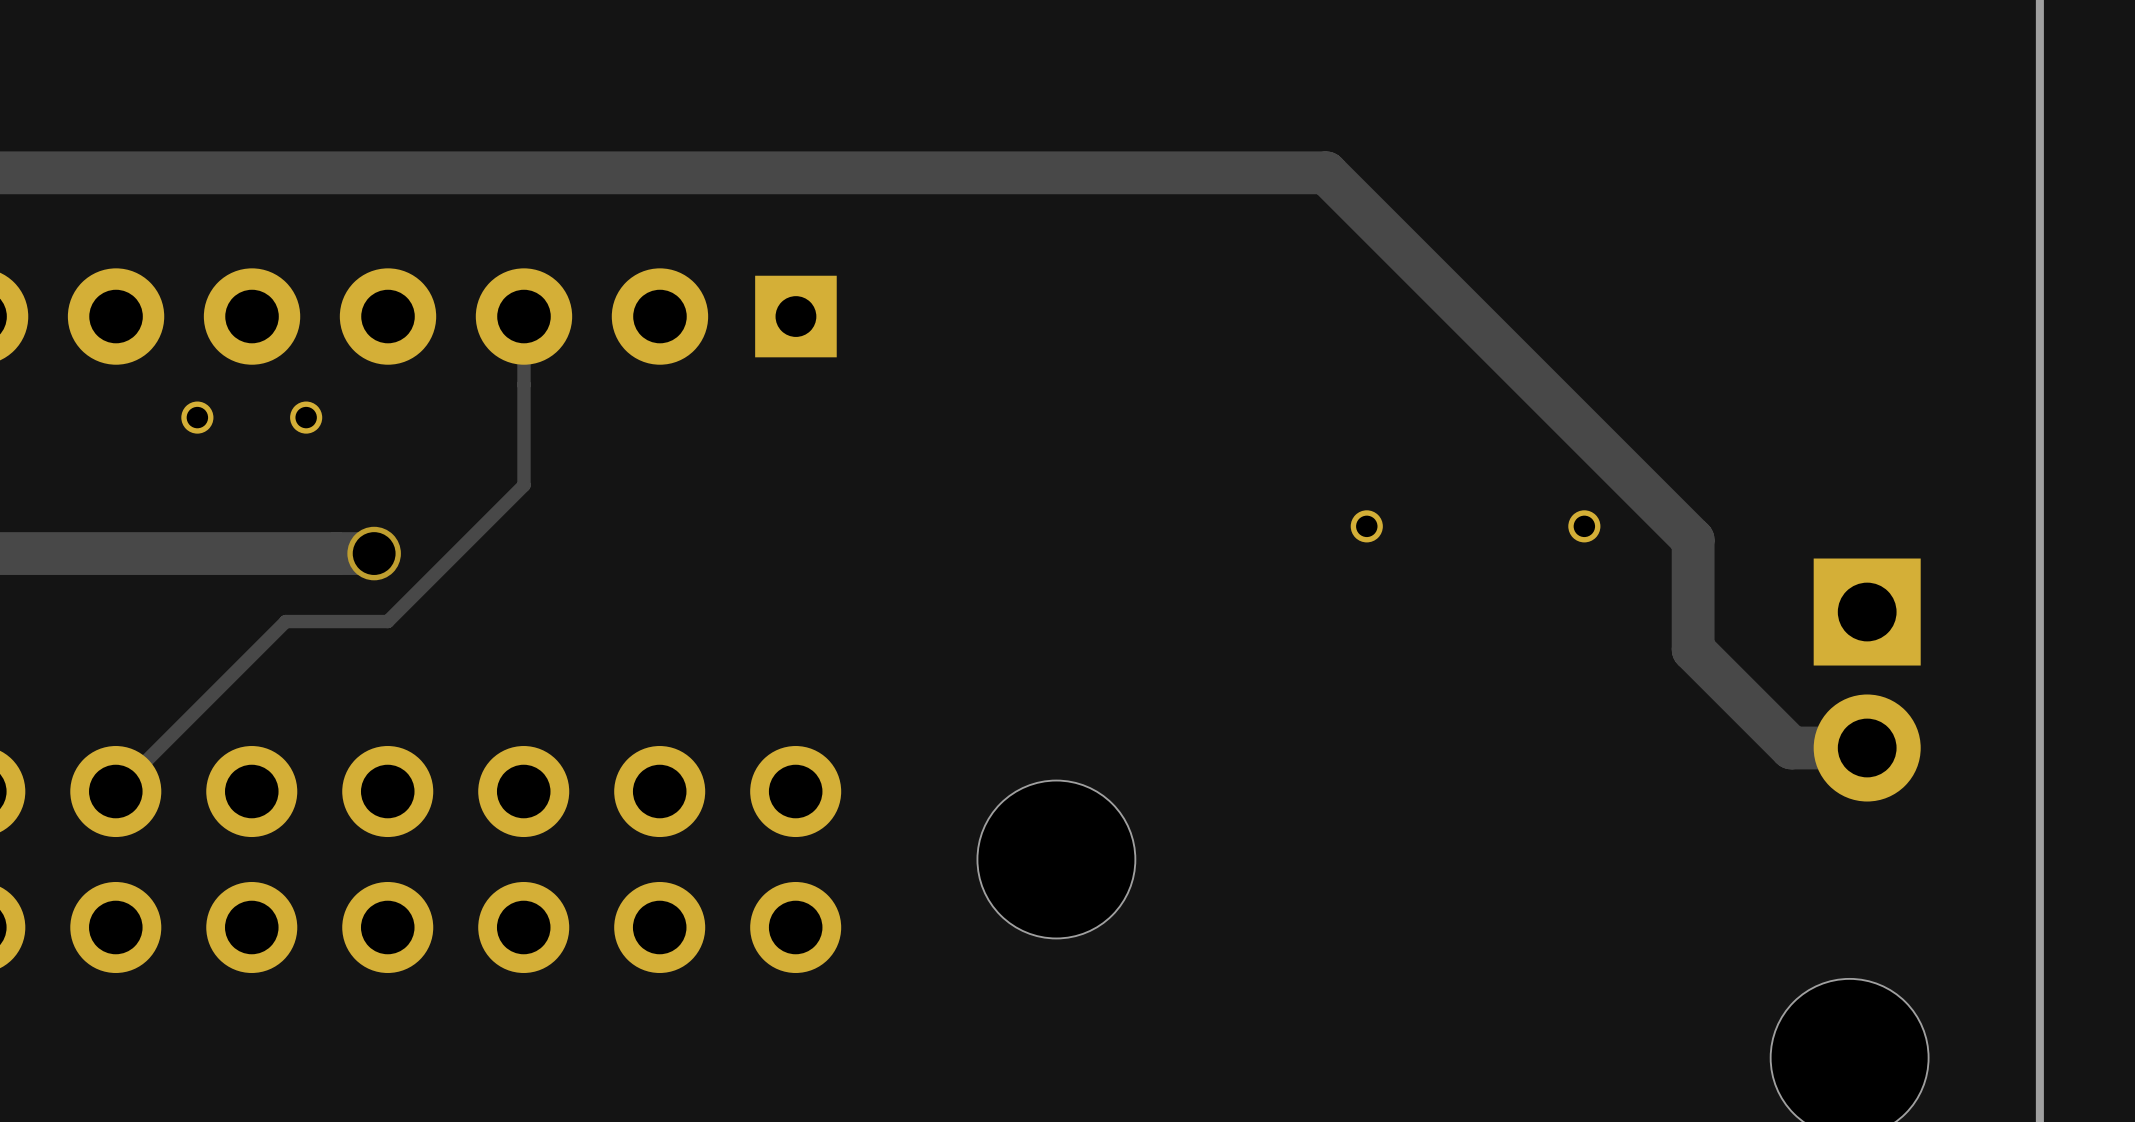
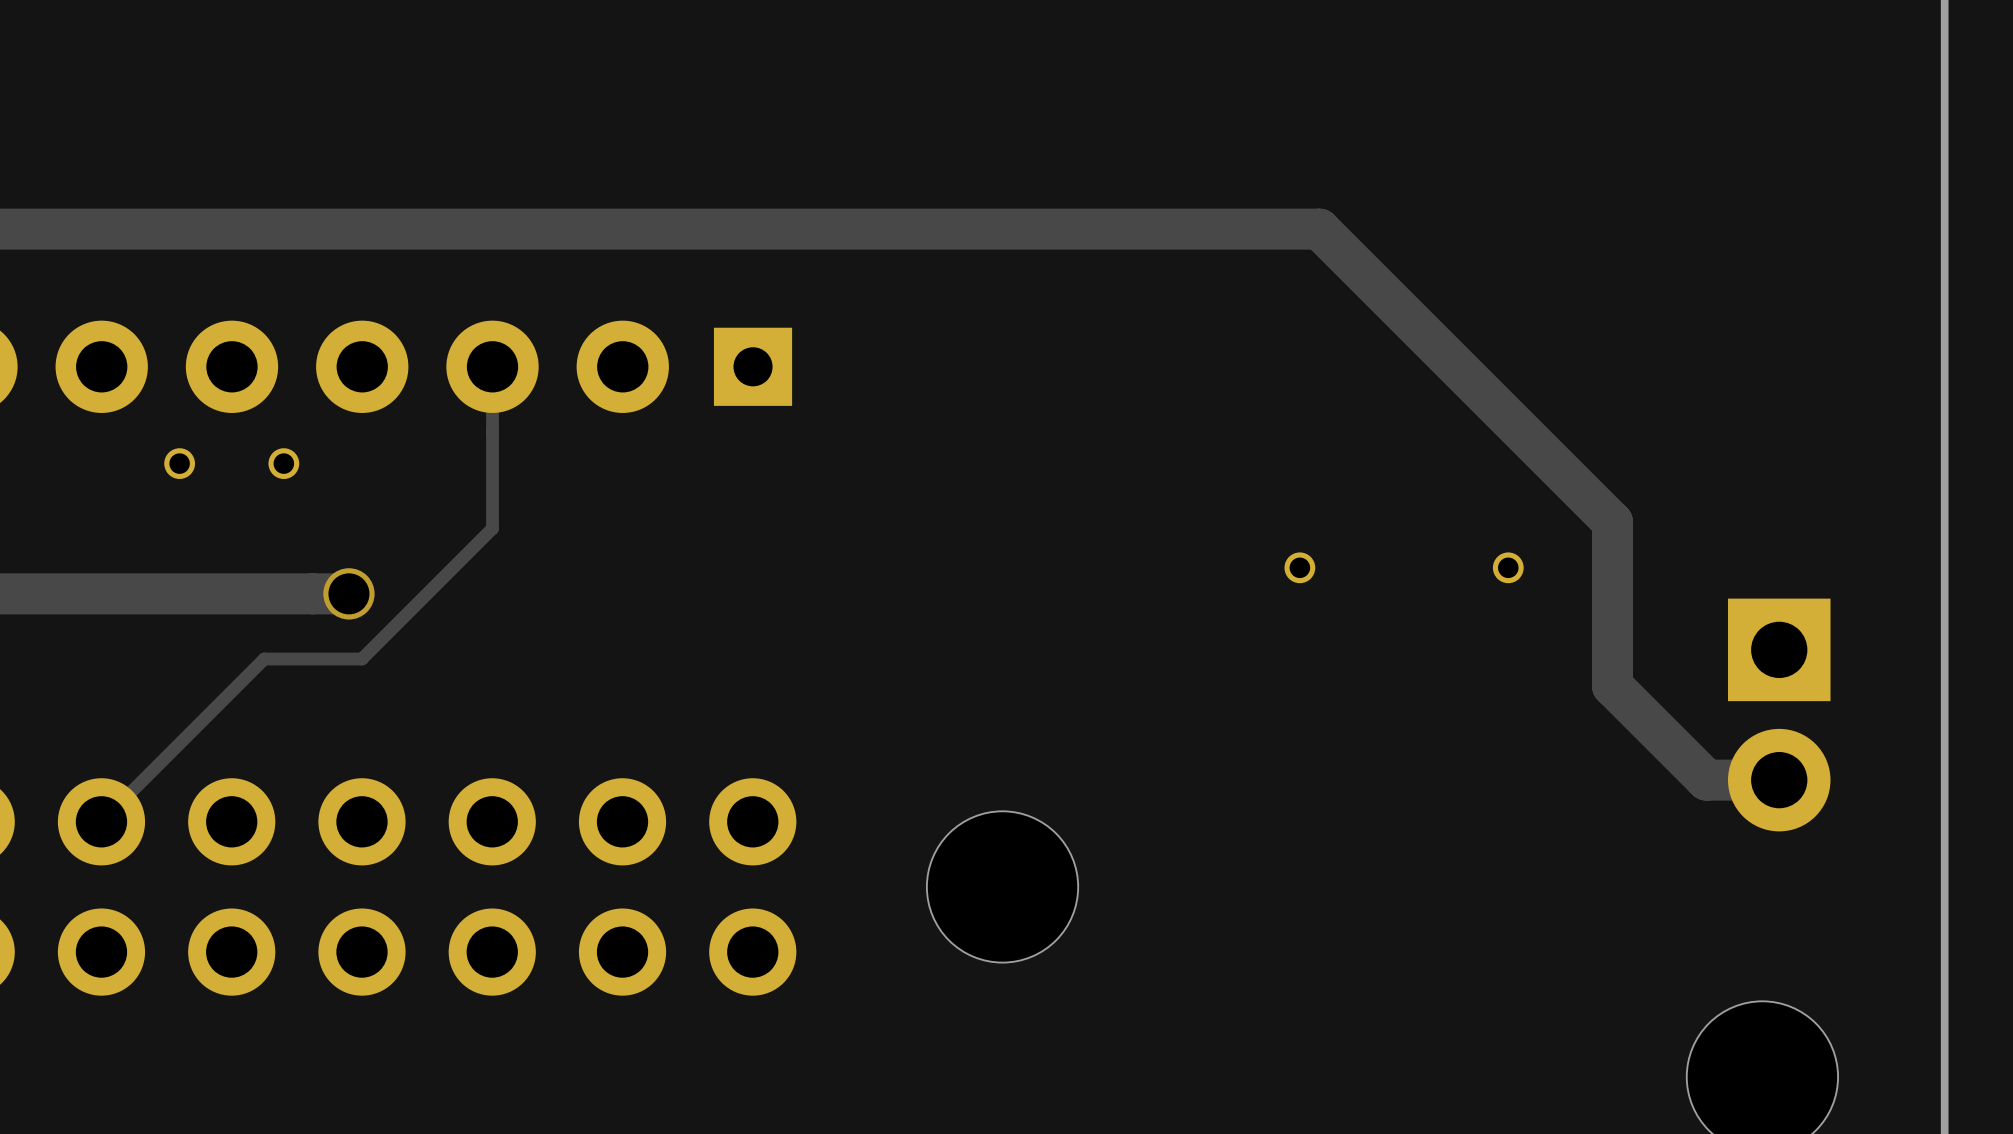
track: (1326, 172) (1693, 539) -> (1260, 229) (1319, 229) (1612, 522) (1612, 580)

